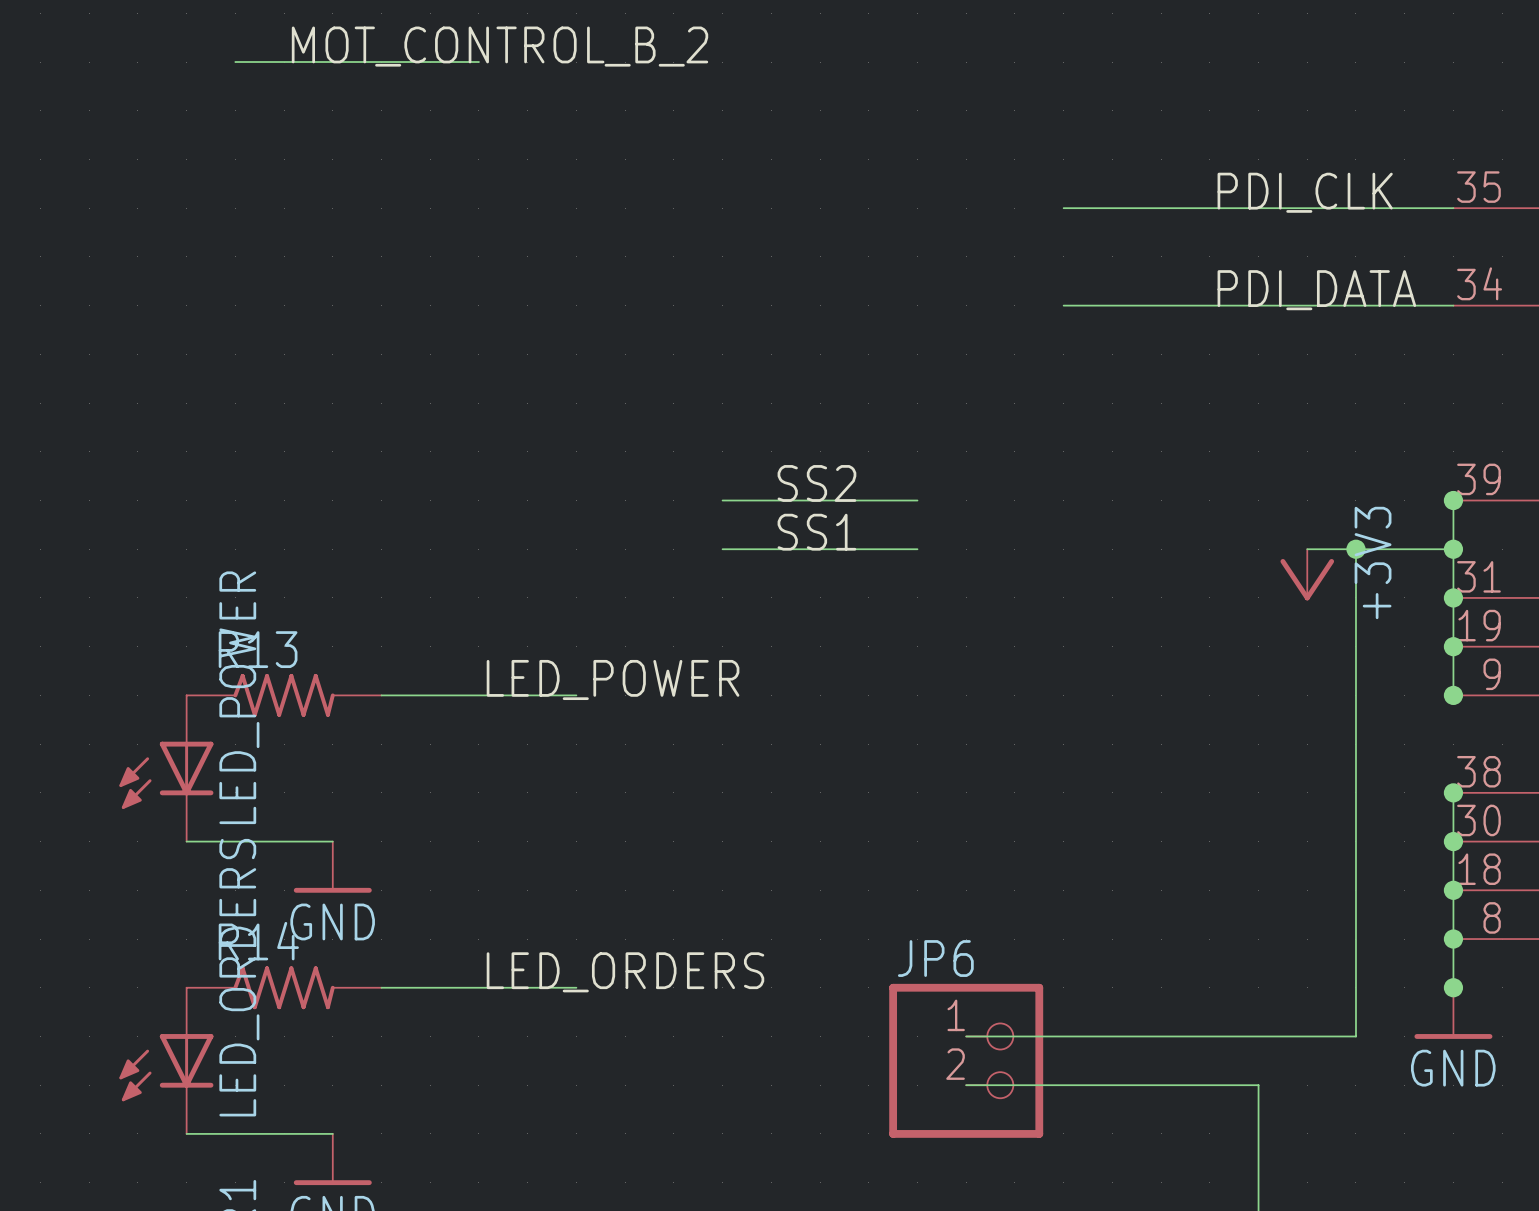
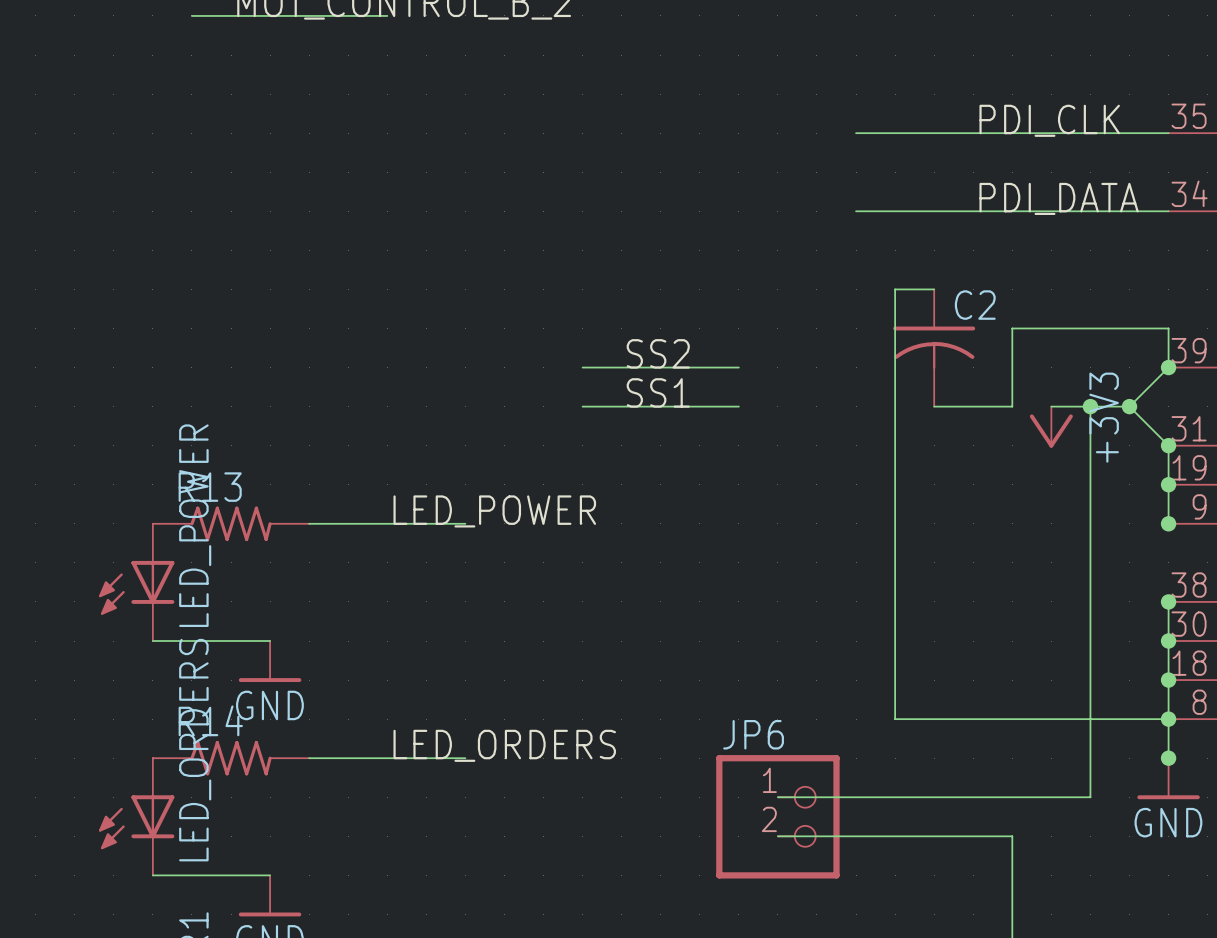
wire: none -> (934, 289) (895, 289) (895, 719) (1168, 719)
C2: none -> (934, 348)
wire: (1453, 500) (1453, 597) -> (934, 406) (1012, 406) (1012, 328) (1168, 328) (1168, 367) (1129, 406) (1168, 445)
wire: (1404, 549) (1453, 549) -> none
junction position: (1453, 549) -> (1129, 406)

